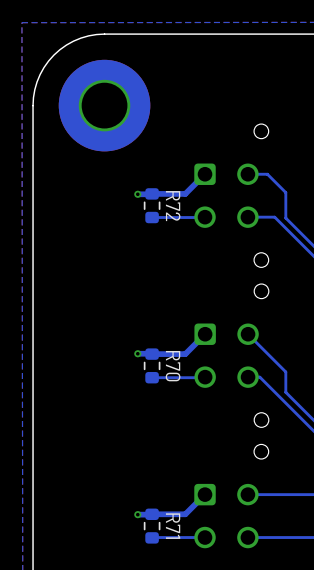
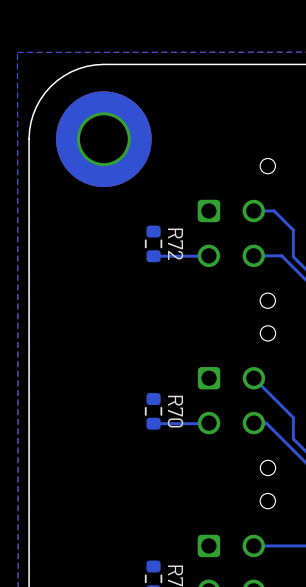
bottom track: (205, 174) (185, 193) (137, 194) -> none
via: (137, 194) -> none
bottom track: (205, 334) (185, 354) (137, 353) -> none
via: (137, 353) -> none
bottom track: (205, 494) (185, 514) (137, 514) -> none
via: (137, 514) -> none

